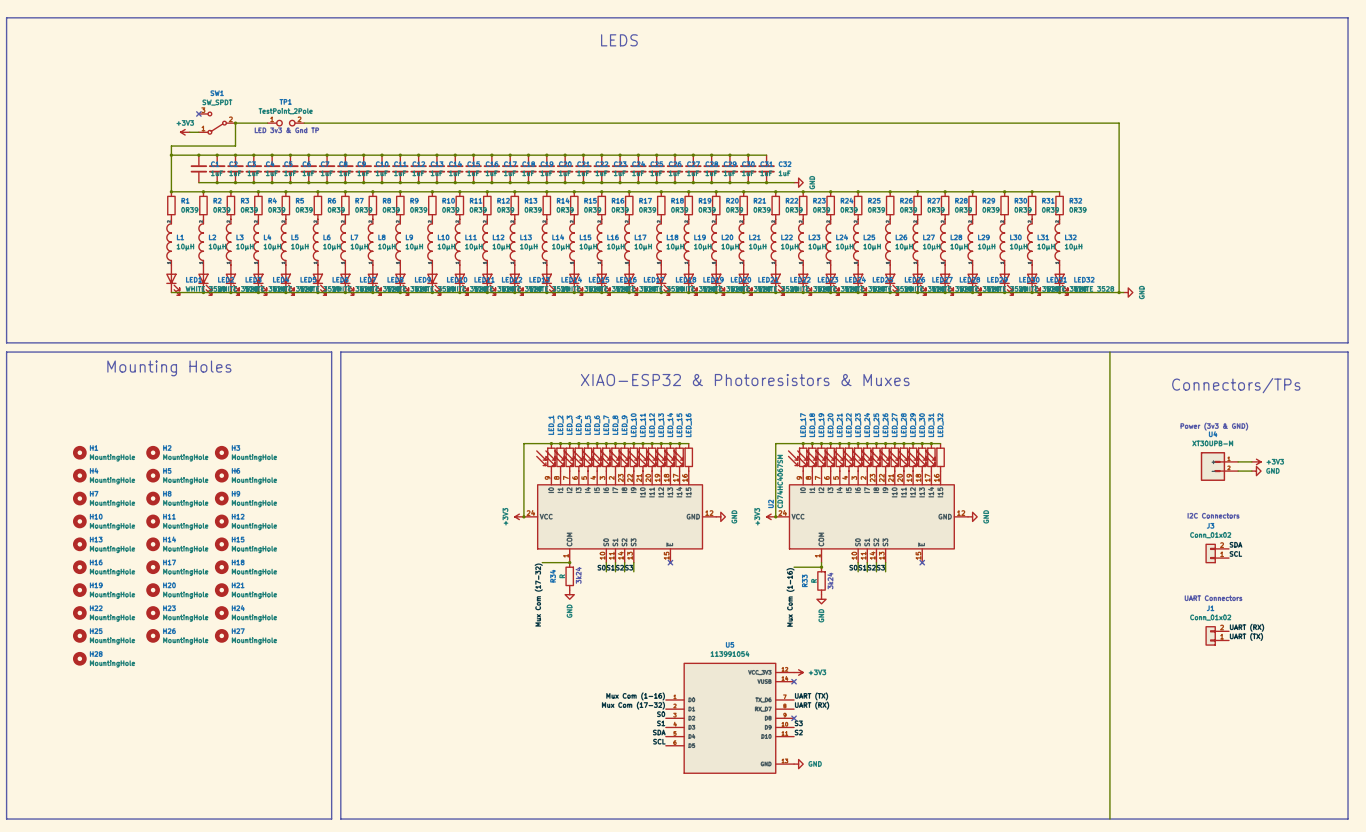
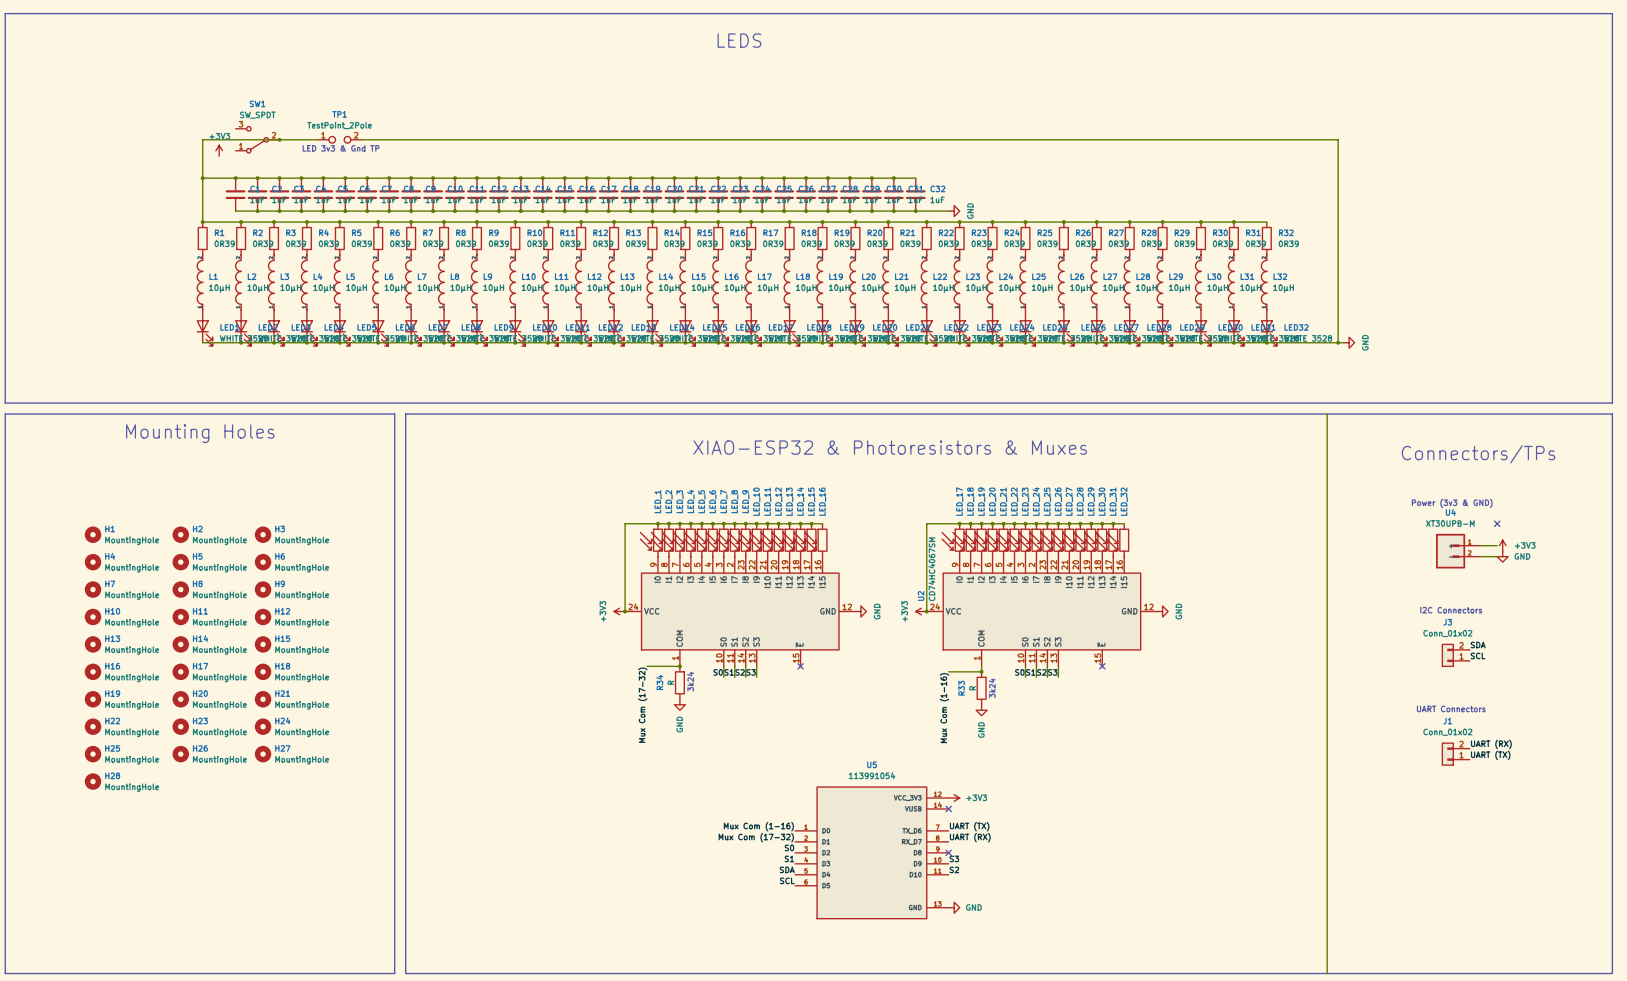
no-connect mark: (198, 113) -> none
wire: (235, 123) (235, 146) (171, 146) -> (279, 139) (202, 139) (202, 167)
power symbol rotation: 0° (185, 132) -> 90° clockwise (219, 150)
wire: (189, 132) (198, 132) -> none
no-connect mark: none -> (1497, 523)
power symbol rotation: 0° (1256, 461) -> 90° counterclockwise (1502, 545)
power symbol rotation: 0° (1256, 471) -> 90° clockwise (1502, 556)

